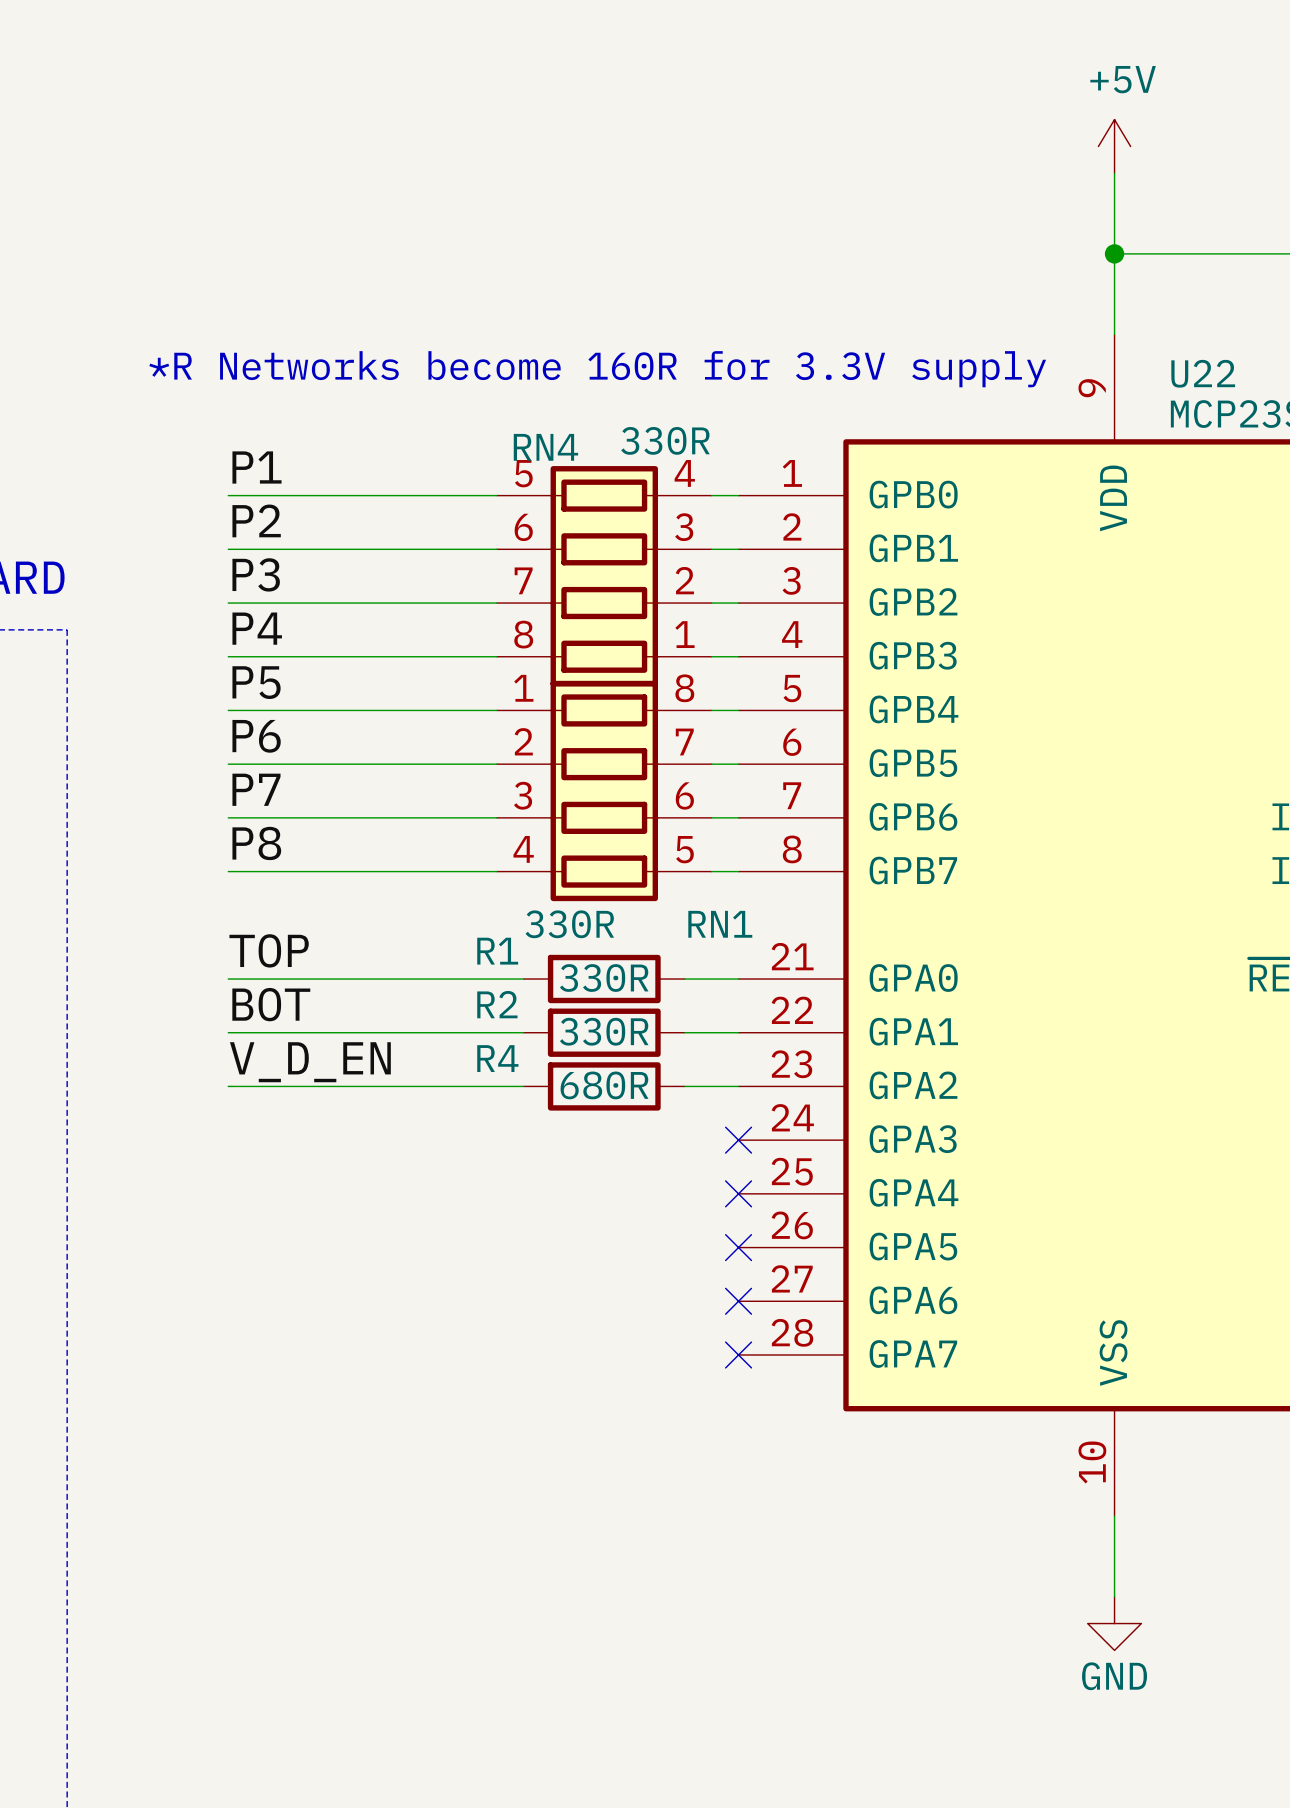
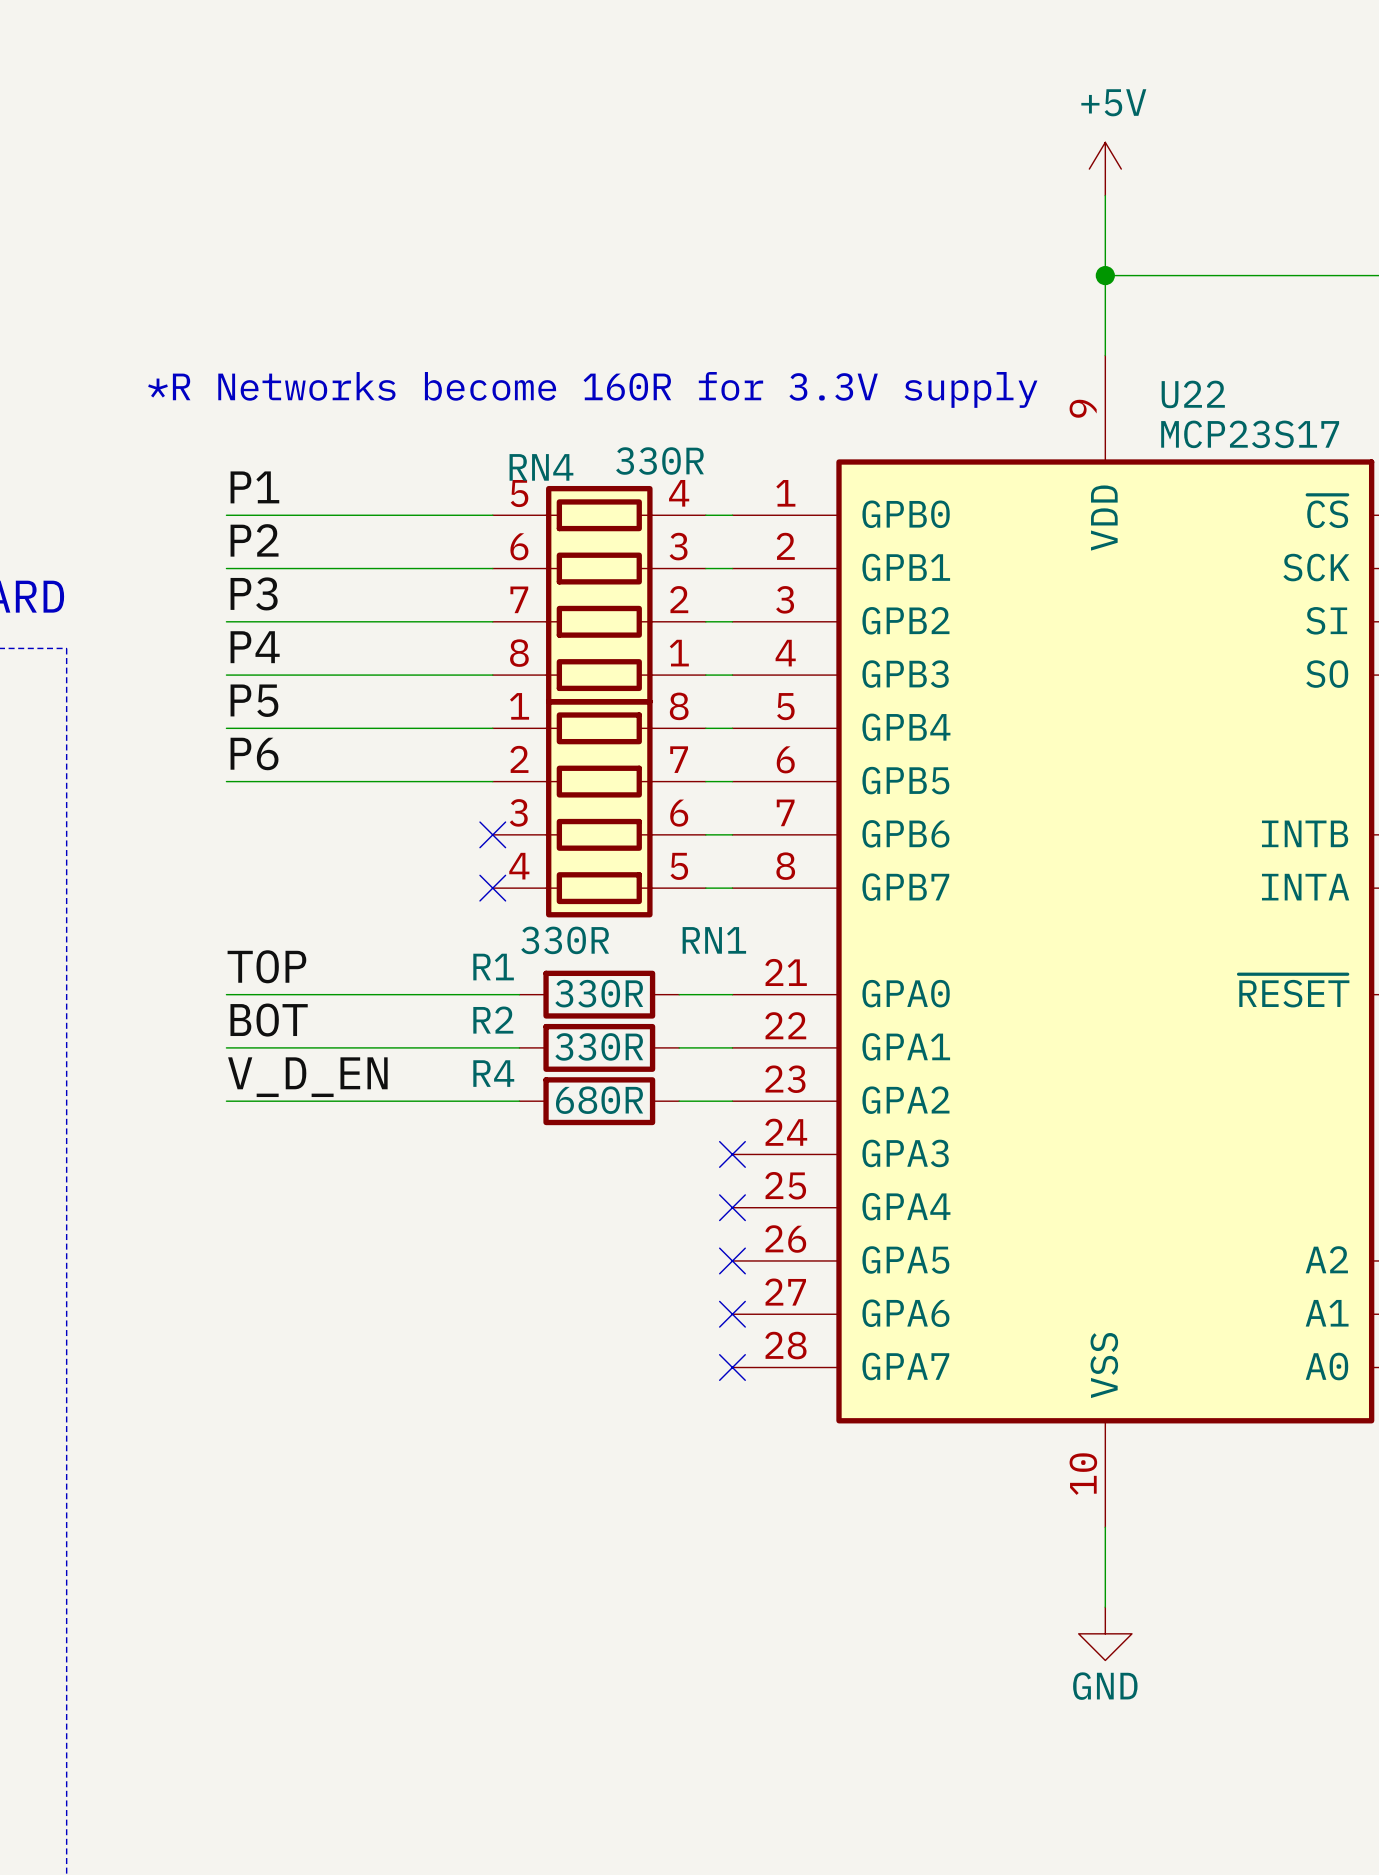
label: P7 (256, 789) -> none
wire: (228, 817) (496, 817) -> none
no-connect mark: none -> (492, 834)
label: P8 (256, 843) -> none
wire: (228, 871) (496, 871) -> none
no-connect mark: none -> (492, 888)

